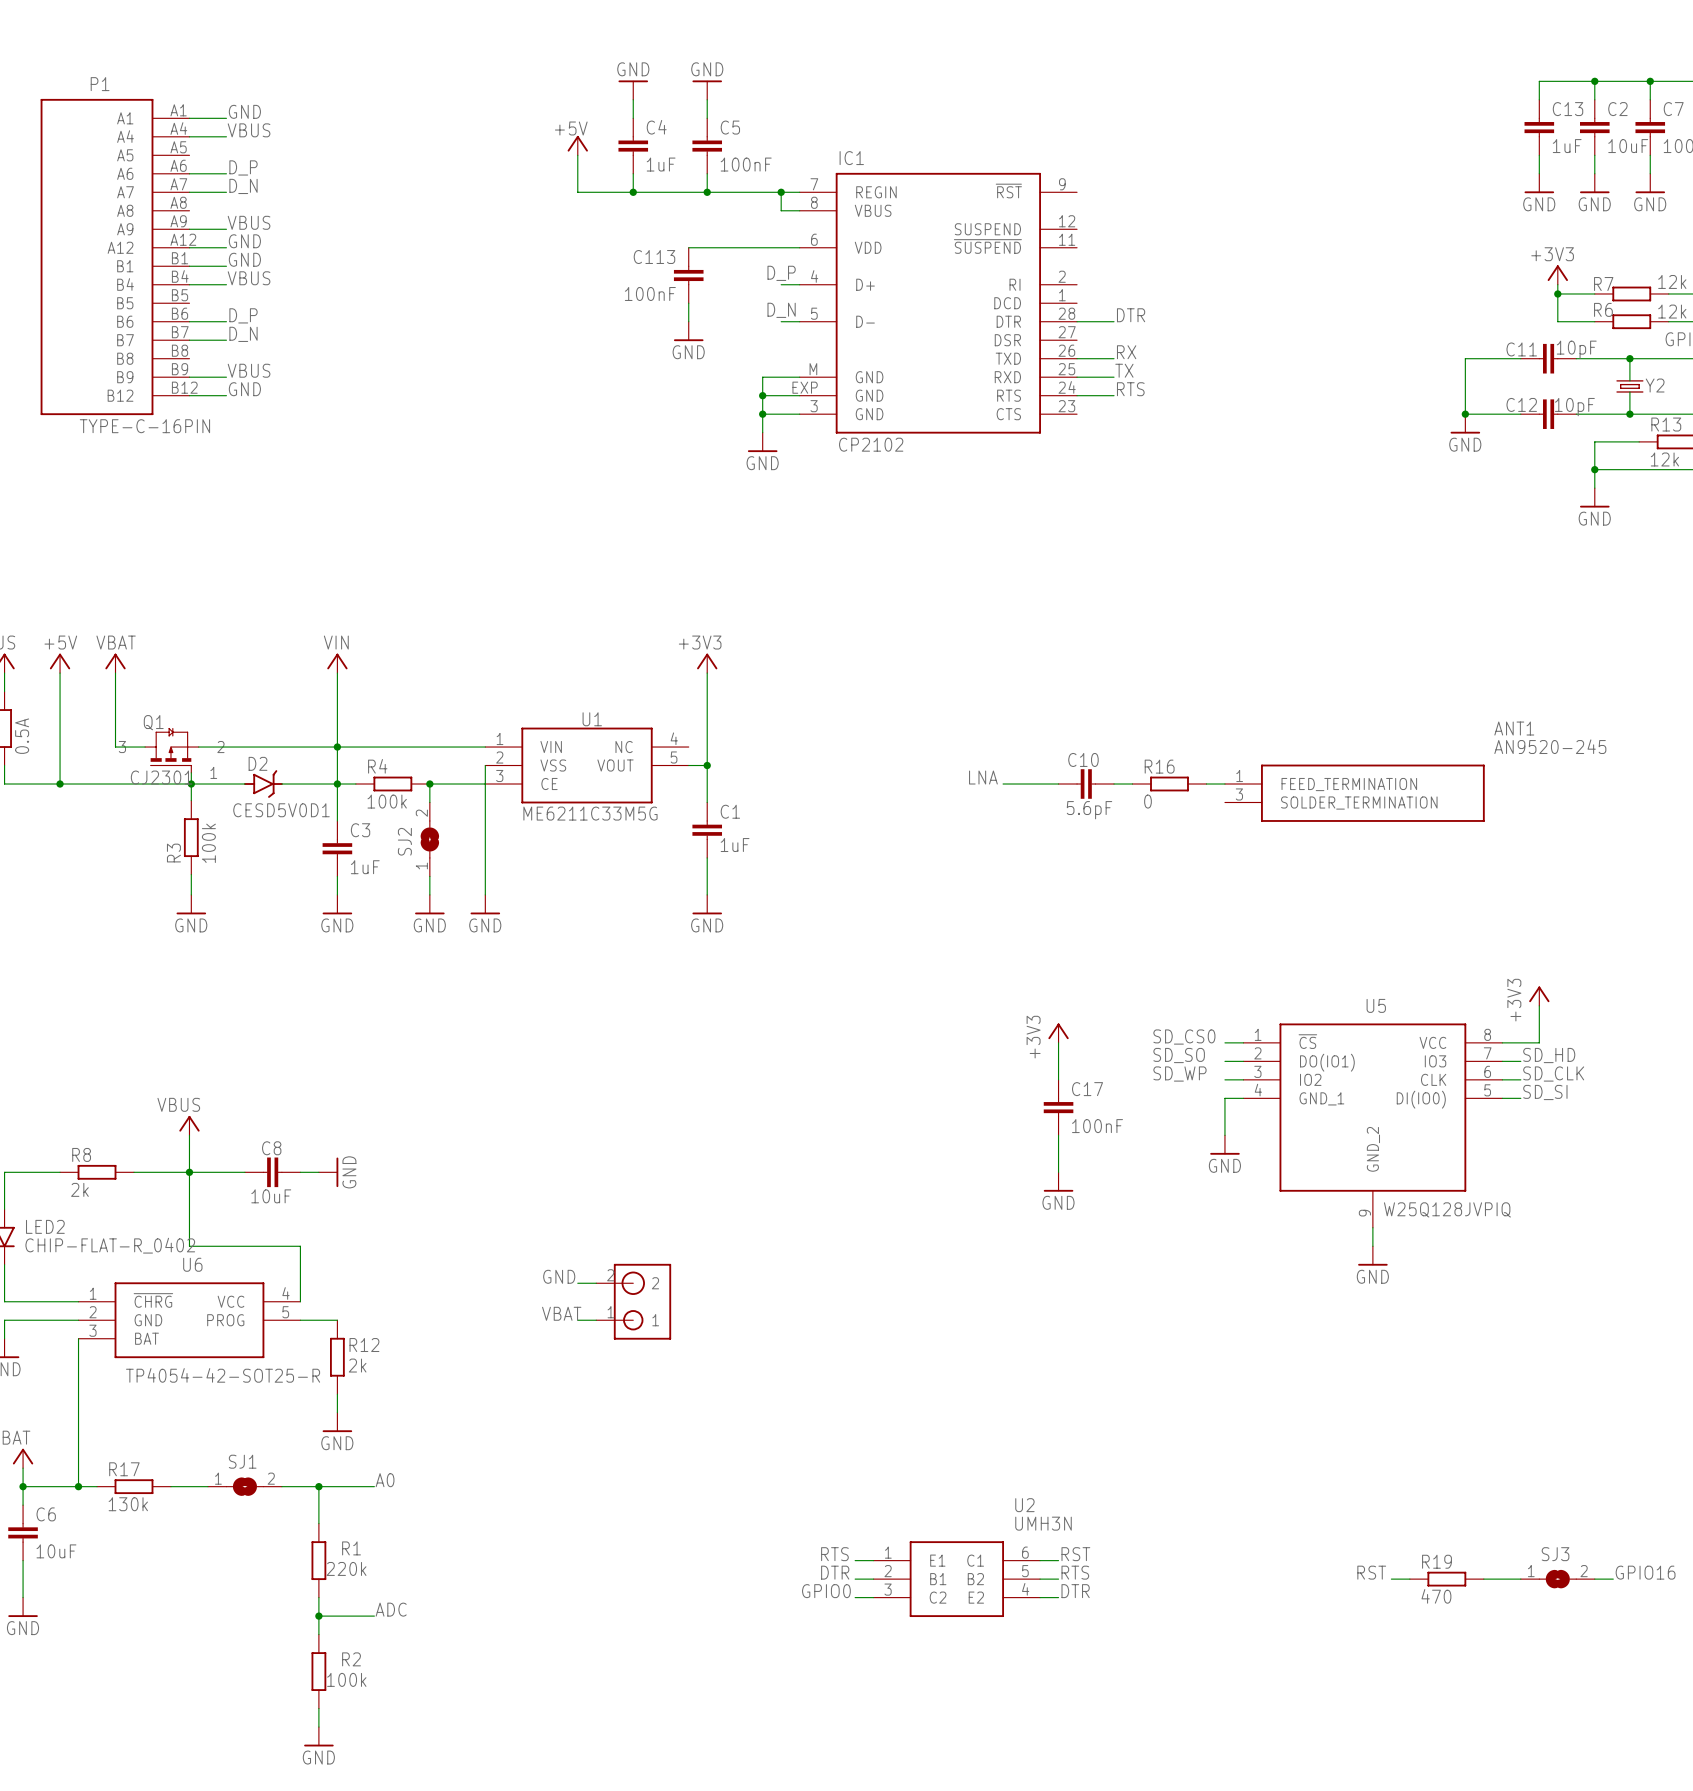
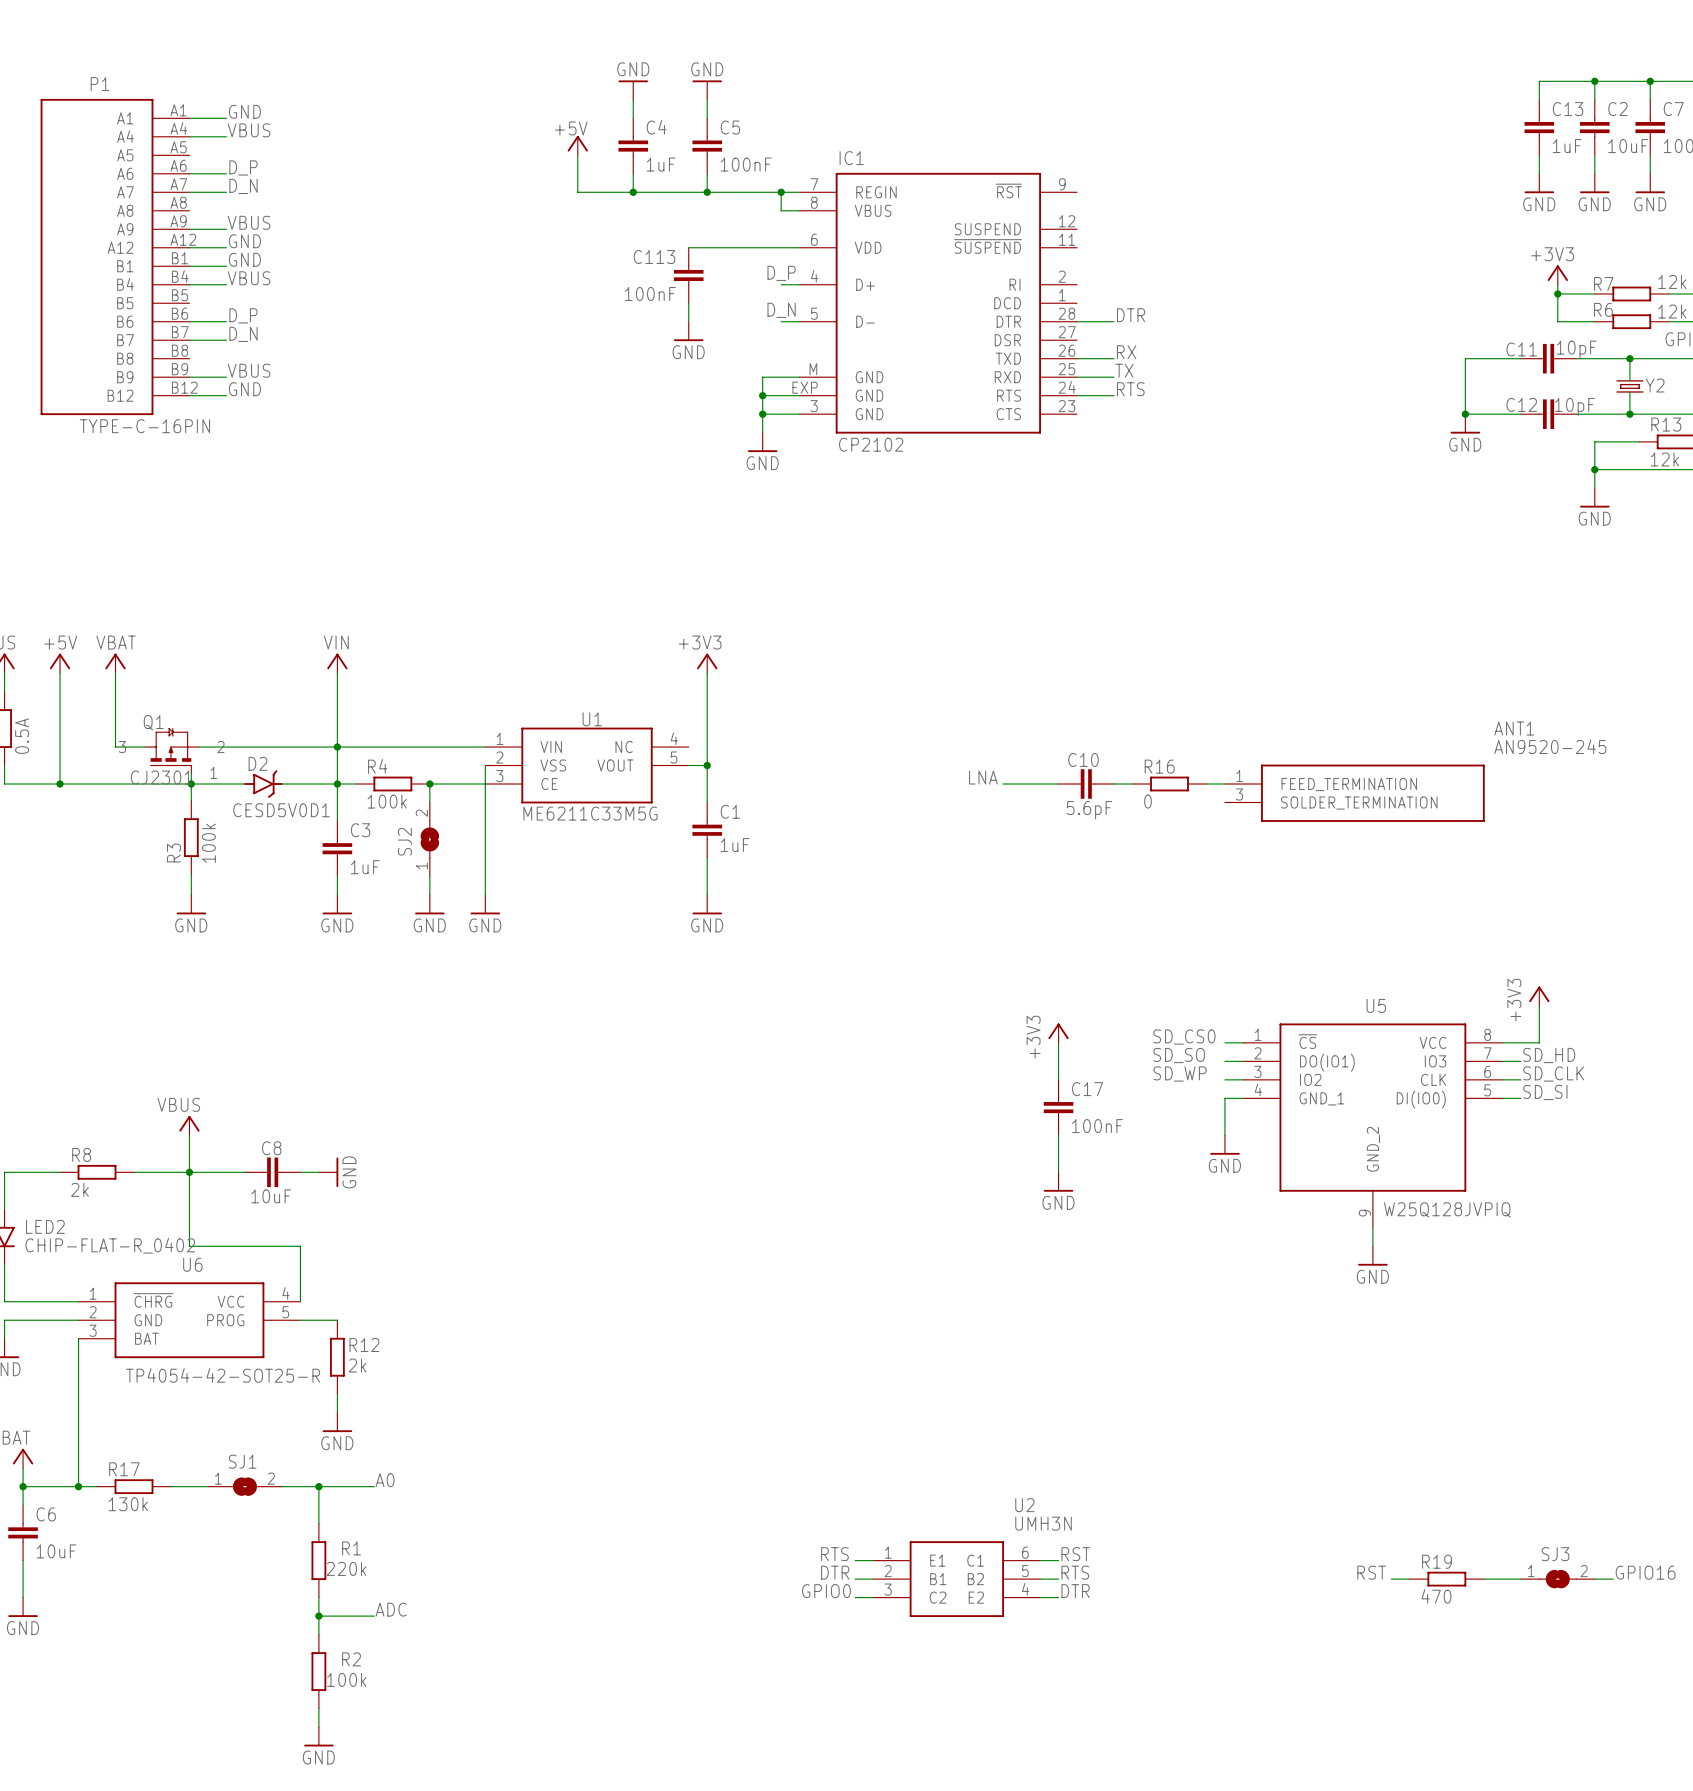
label: GND (559, 1276) -> none
wire: (577, 1283) (596, 1283) -> none
part: (633, 1301) -> none
label: VBAT (561, 1313) -> none
wire: (577, 1320) (596, 1320) -> none

